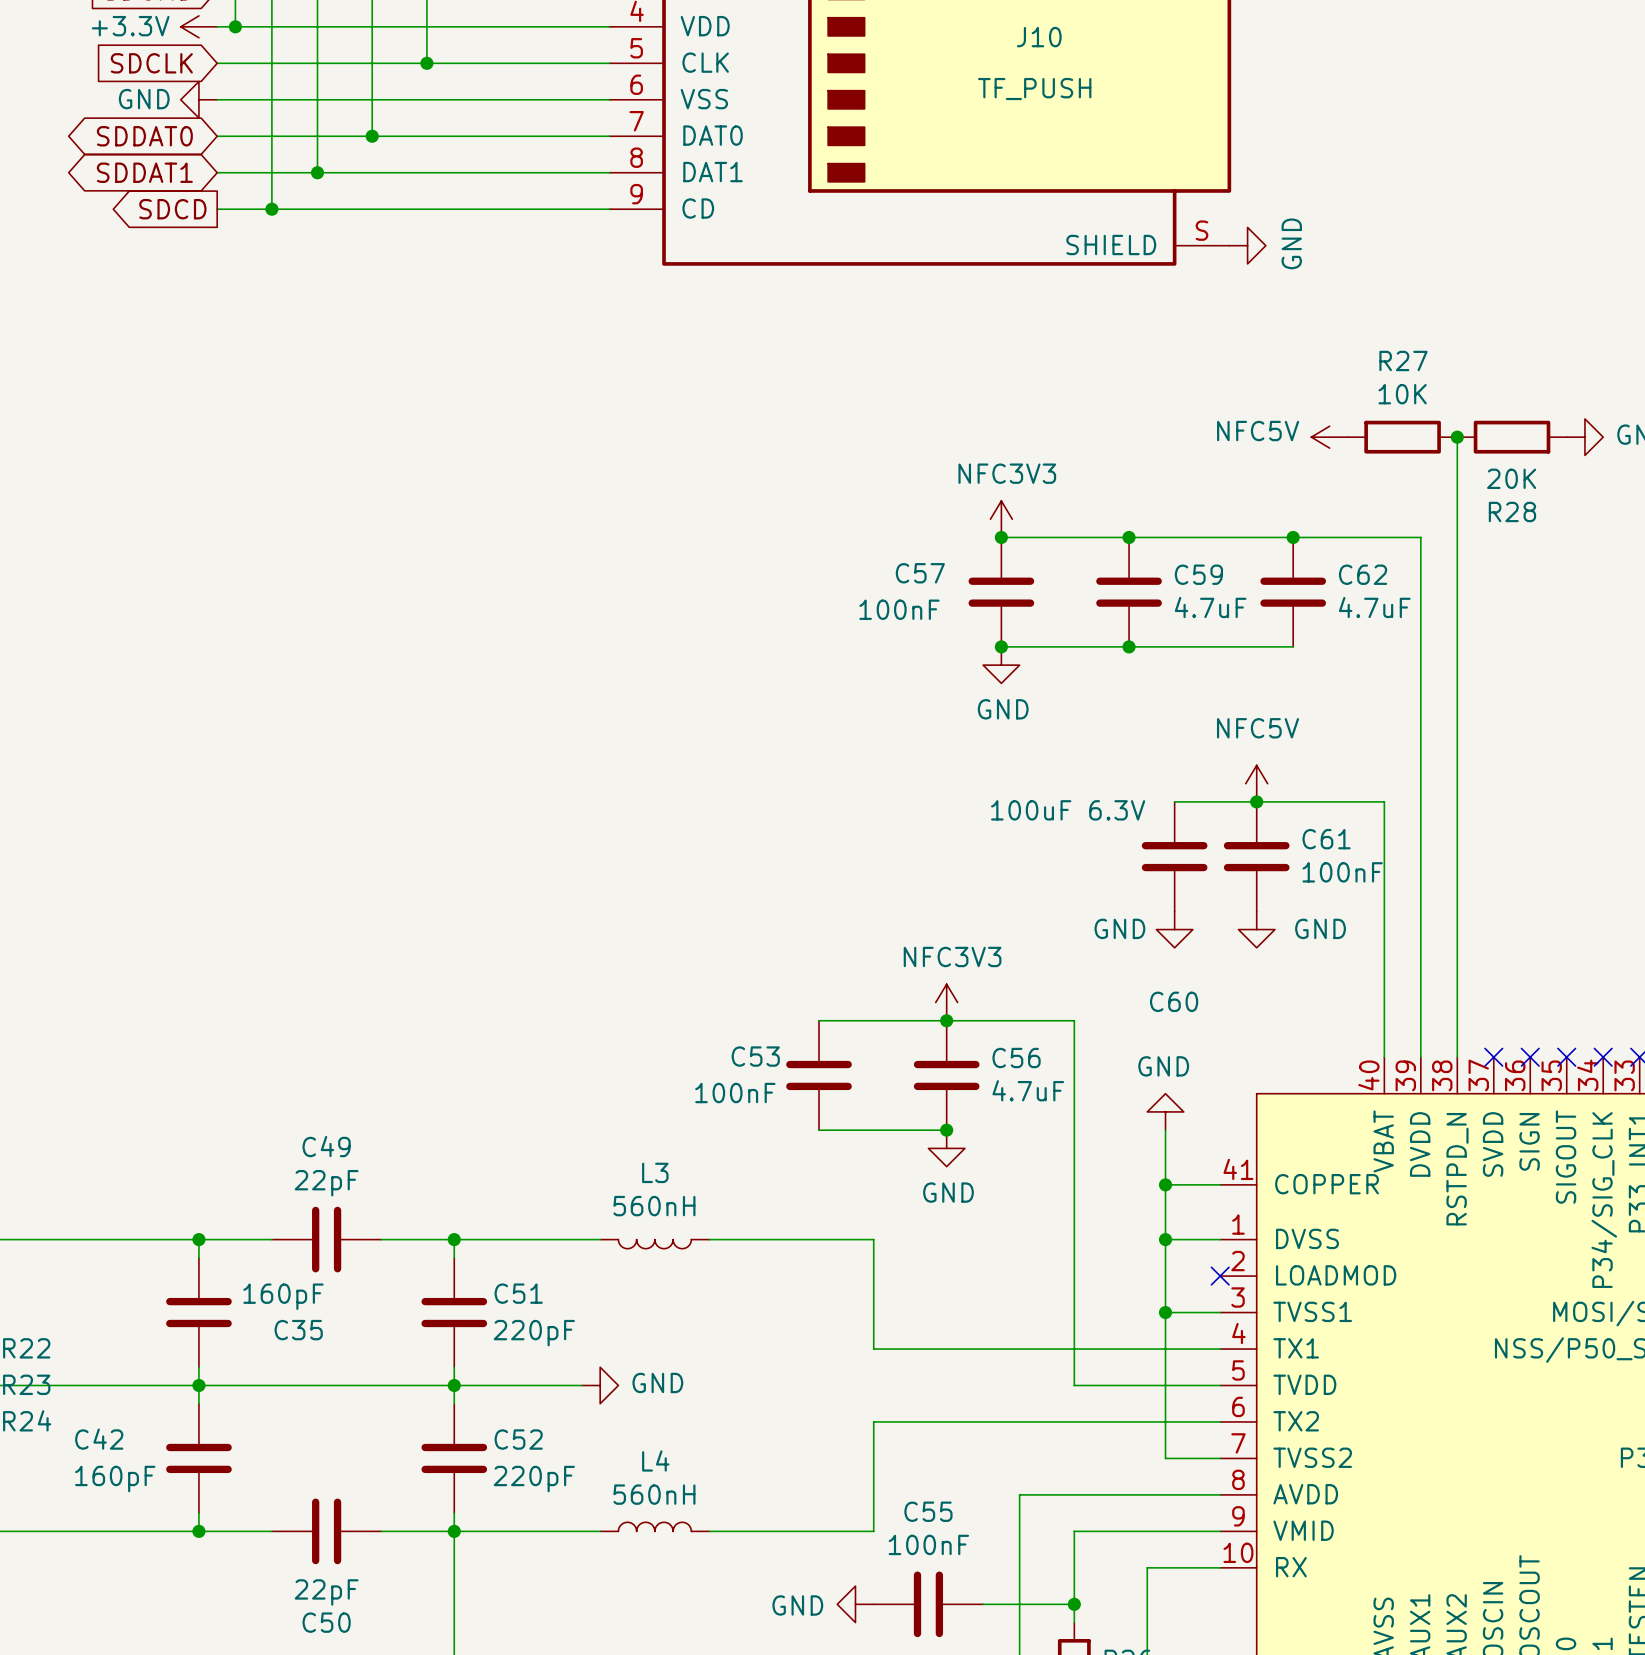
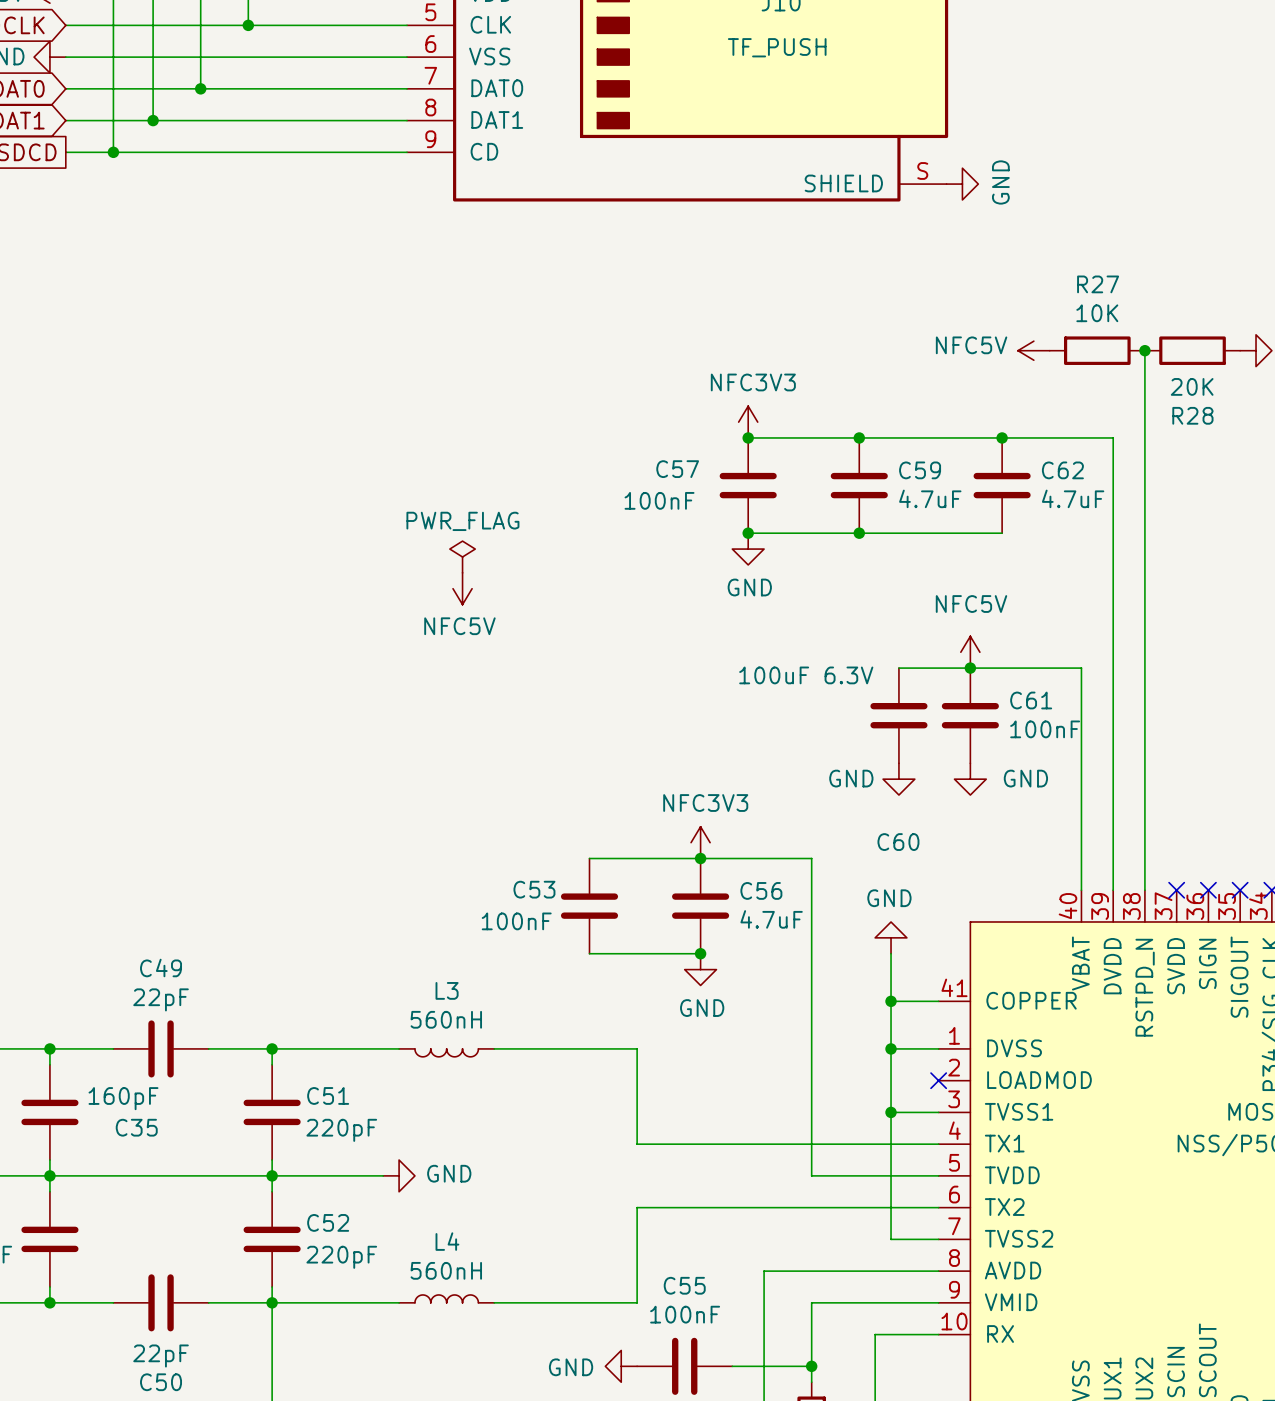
power symbol: none -> PWR_FLAG (462, 557)
power symbol: none -> NFC5V (462, 588)

